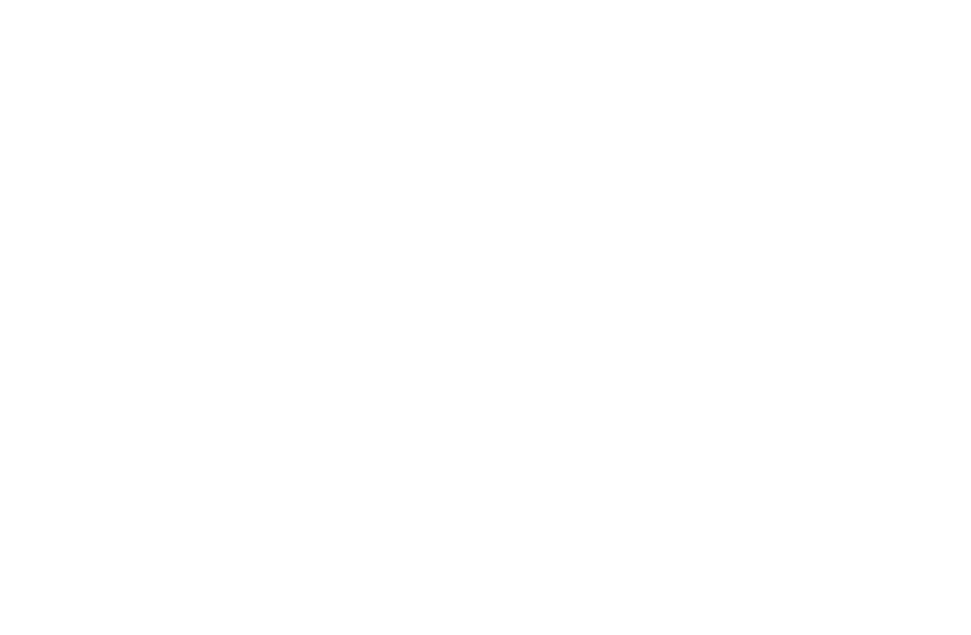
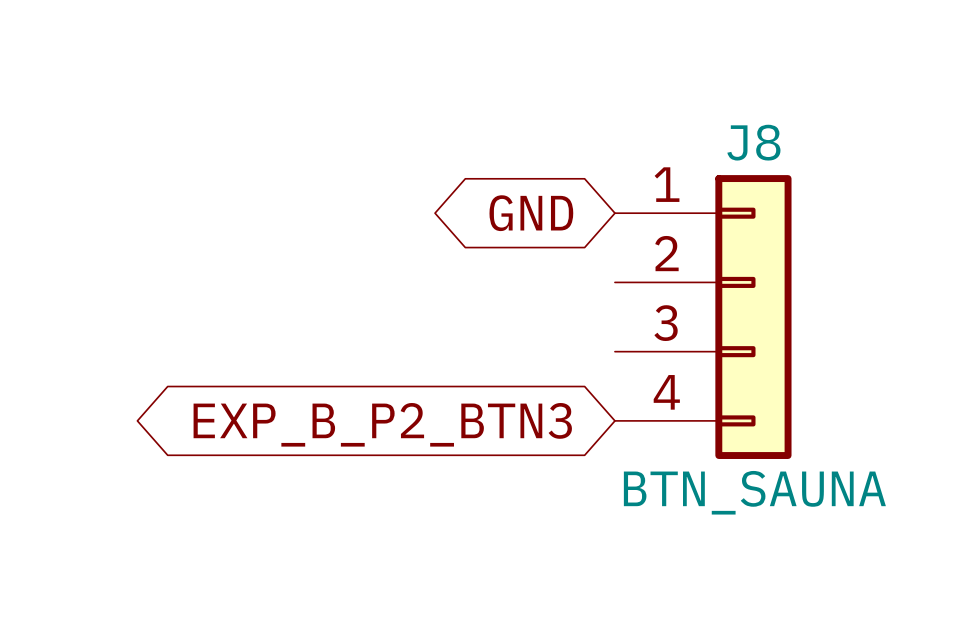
global label: none -> GND (531, 213)
J8: none -> BTN_SAUNA (703, 317)
global label: none -> EXP_B_P2_BTN3 (382, 424)

